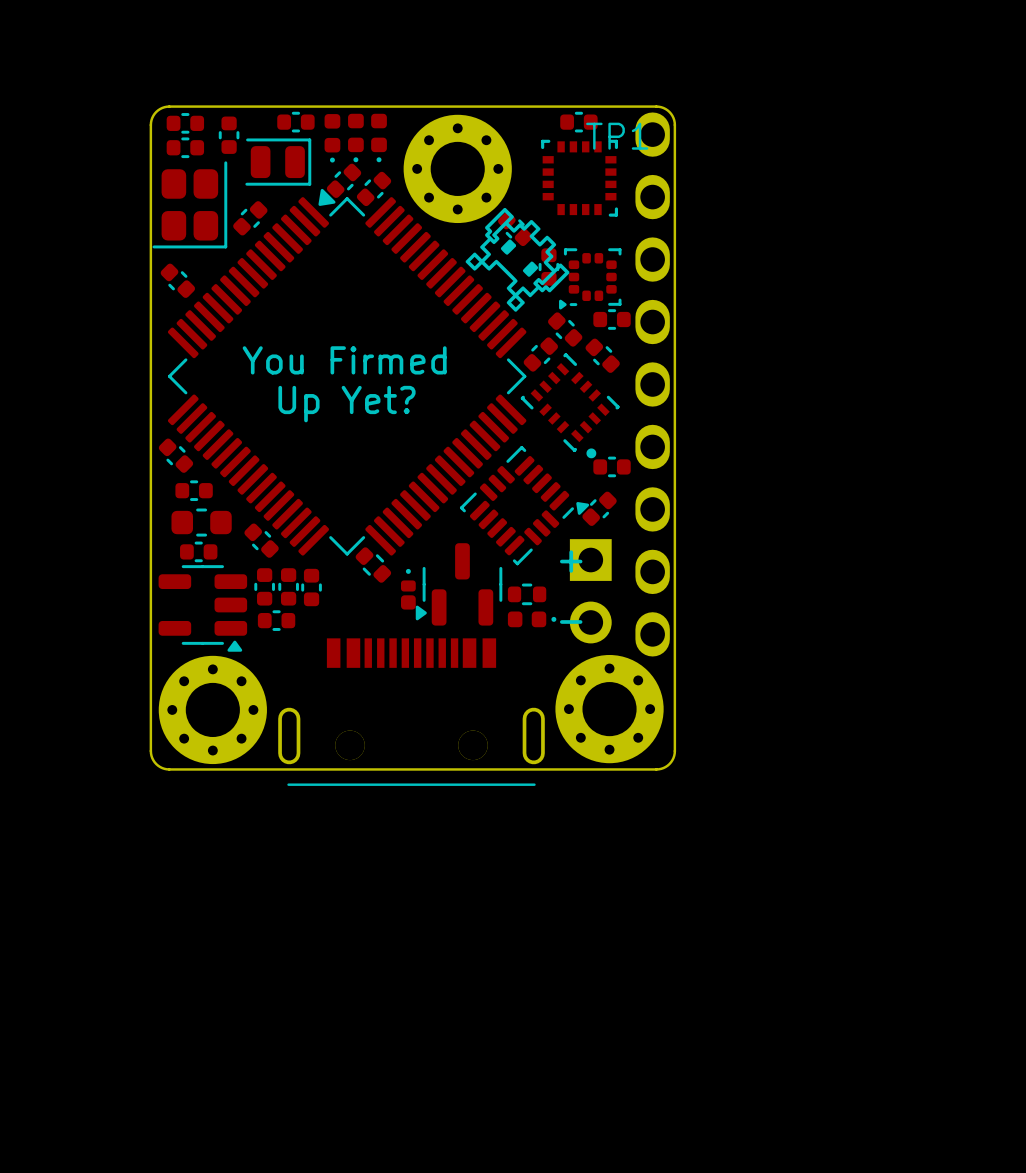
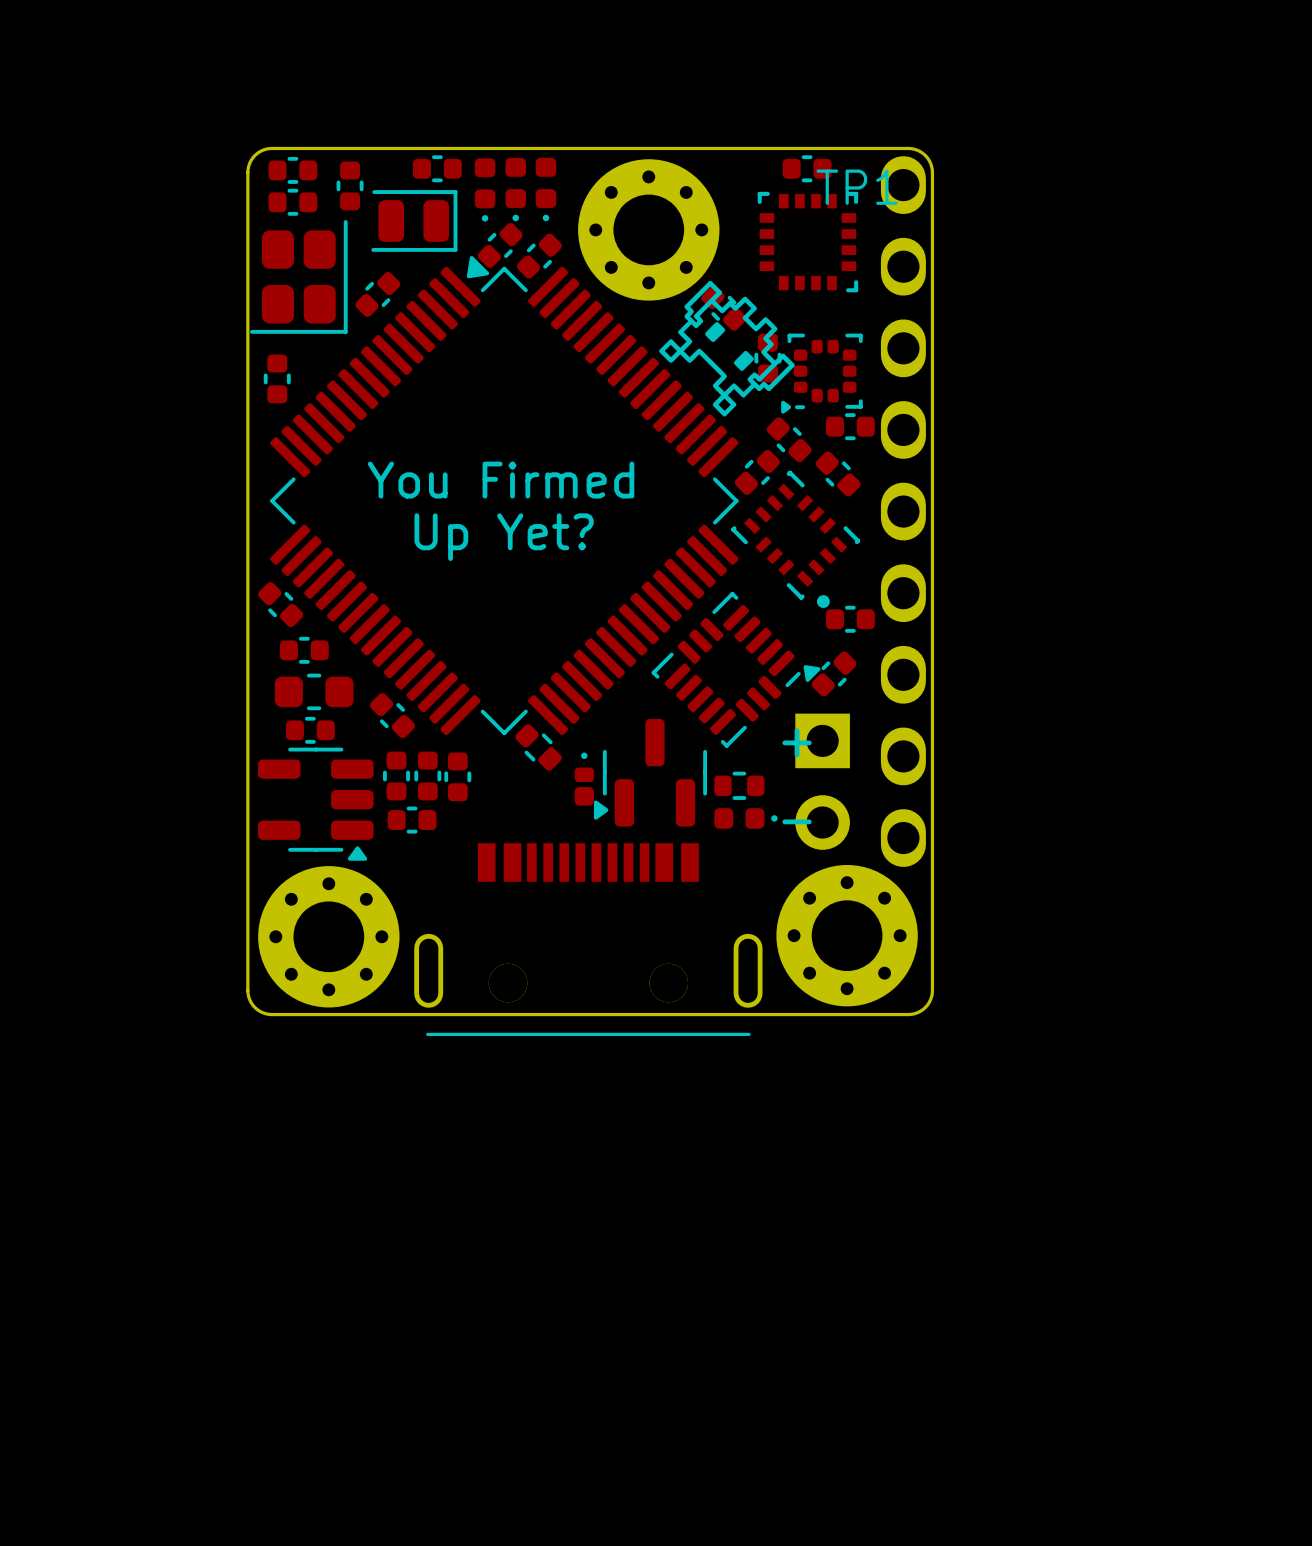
part rotation: 0° (177, 280) -> 45° clockwise (277, 378)

